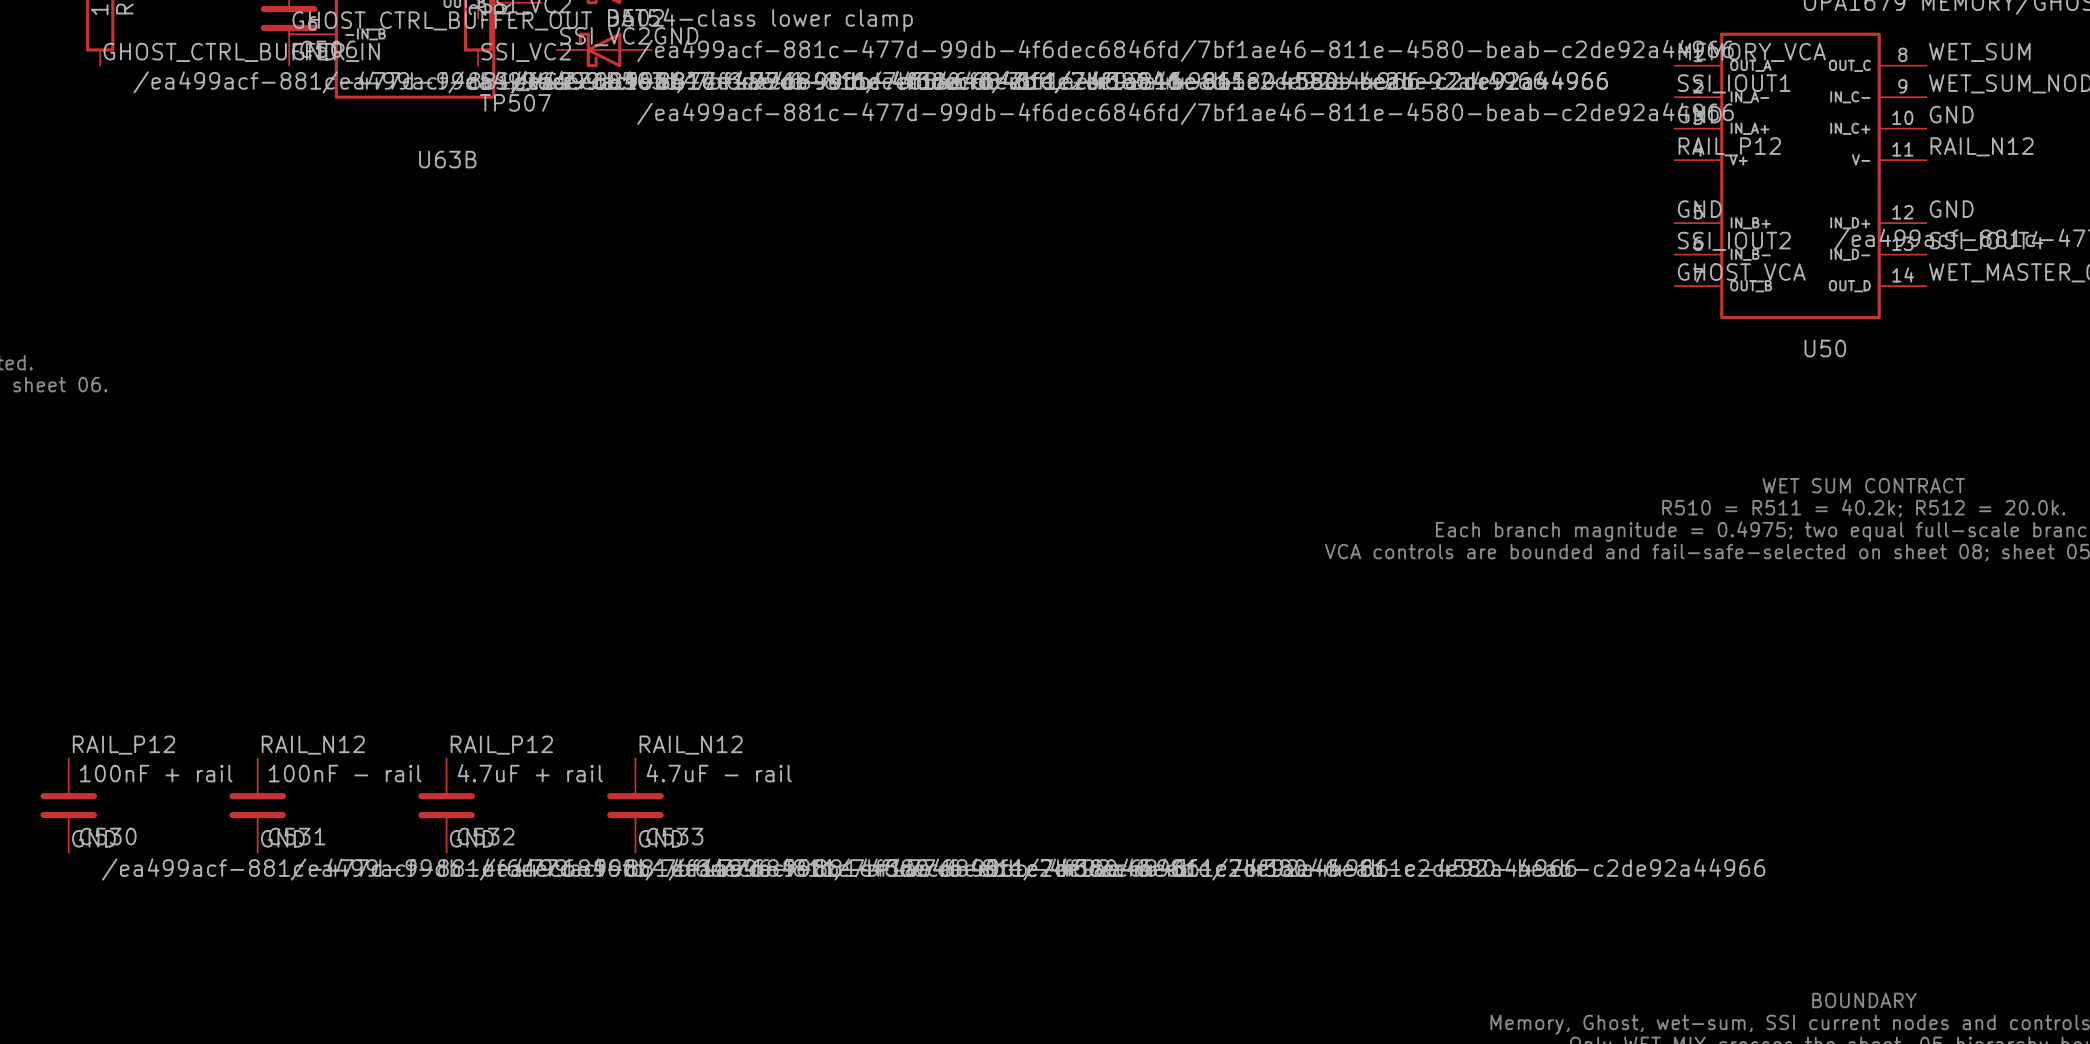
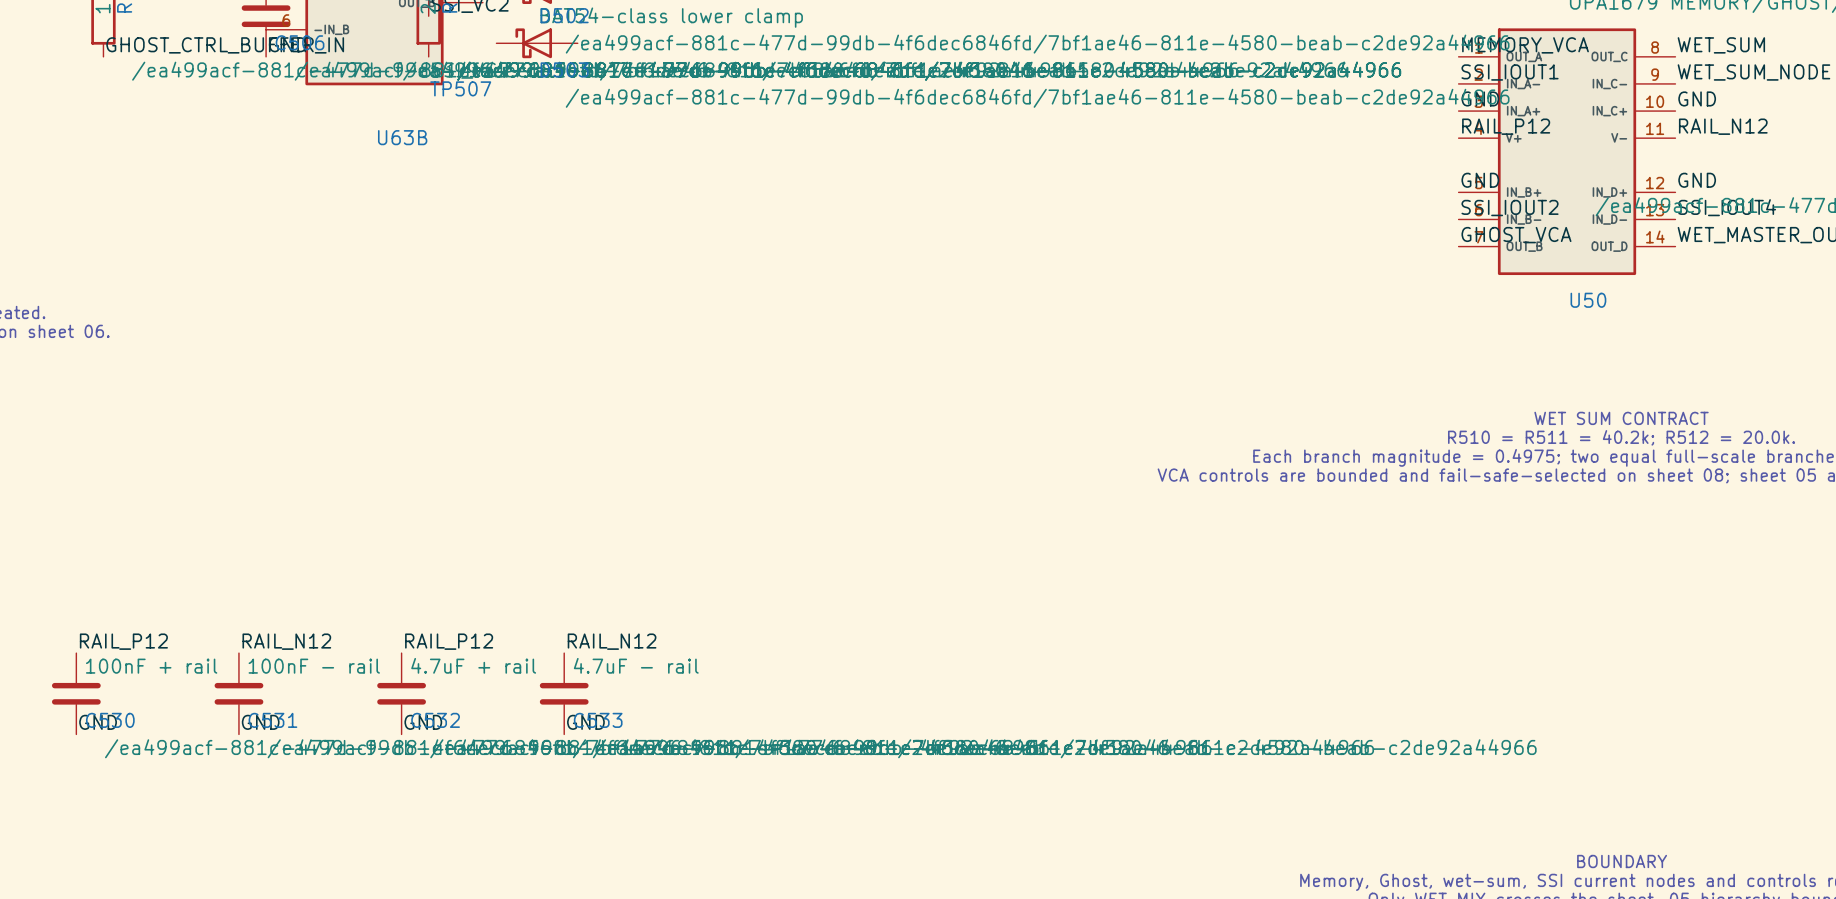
label: GHOST_CTRL_BUFFER_OUT (442, 20) -> none
label: GND (676, 35) -> none
label: SSI_VC2 (604, 36) -> none
label: SSI_VC2 (526, 52) -> none

